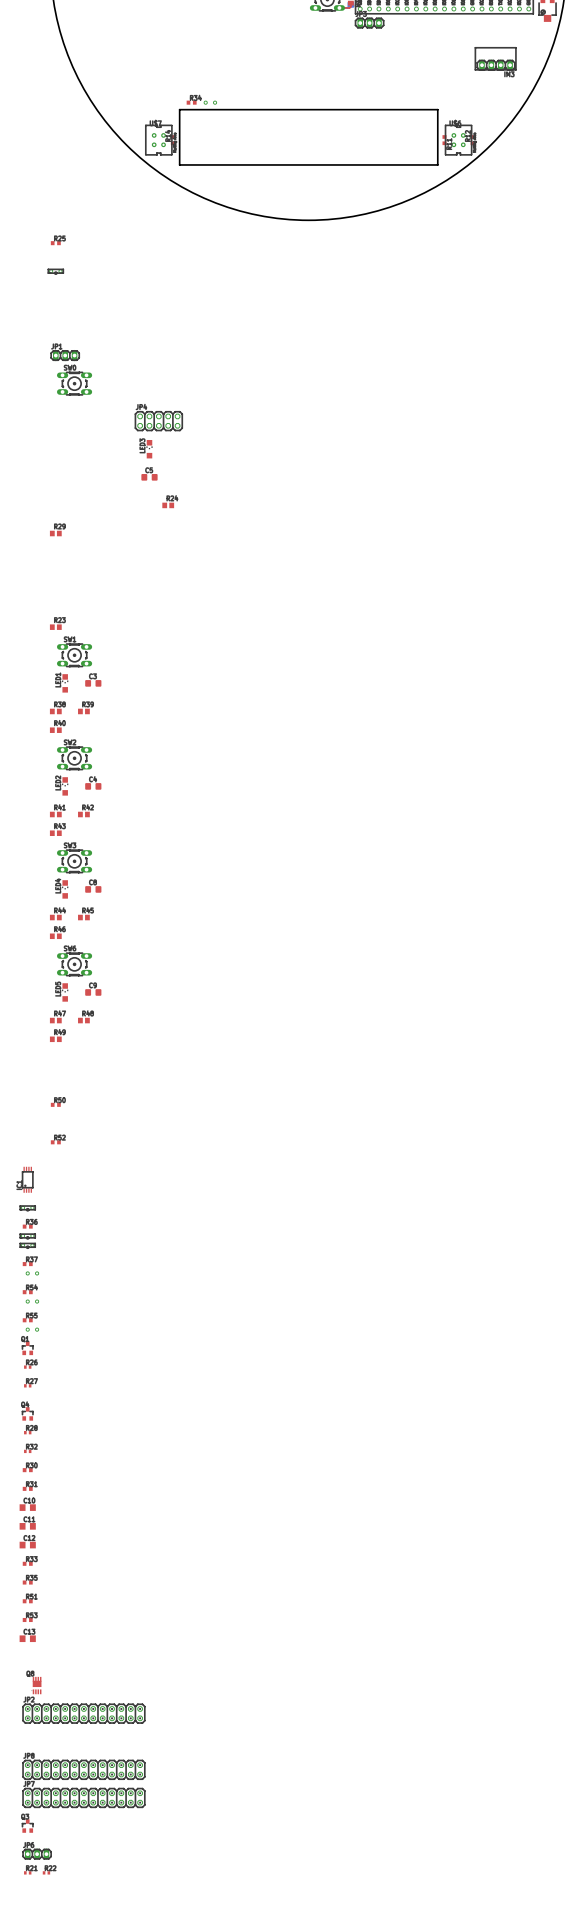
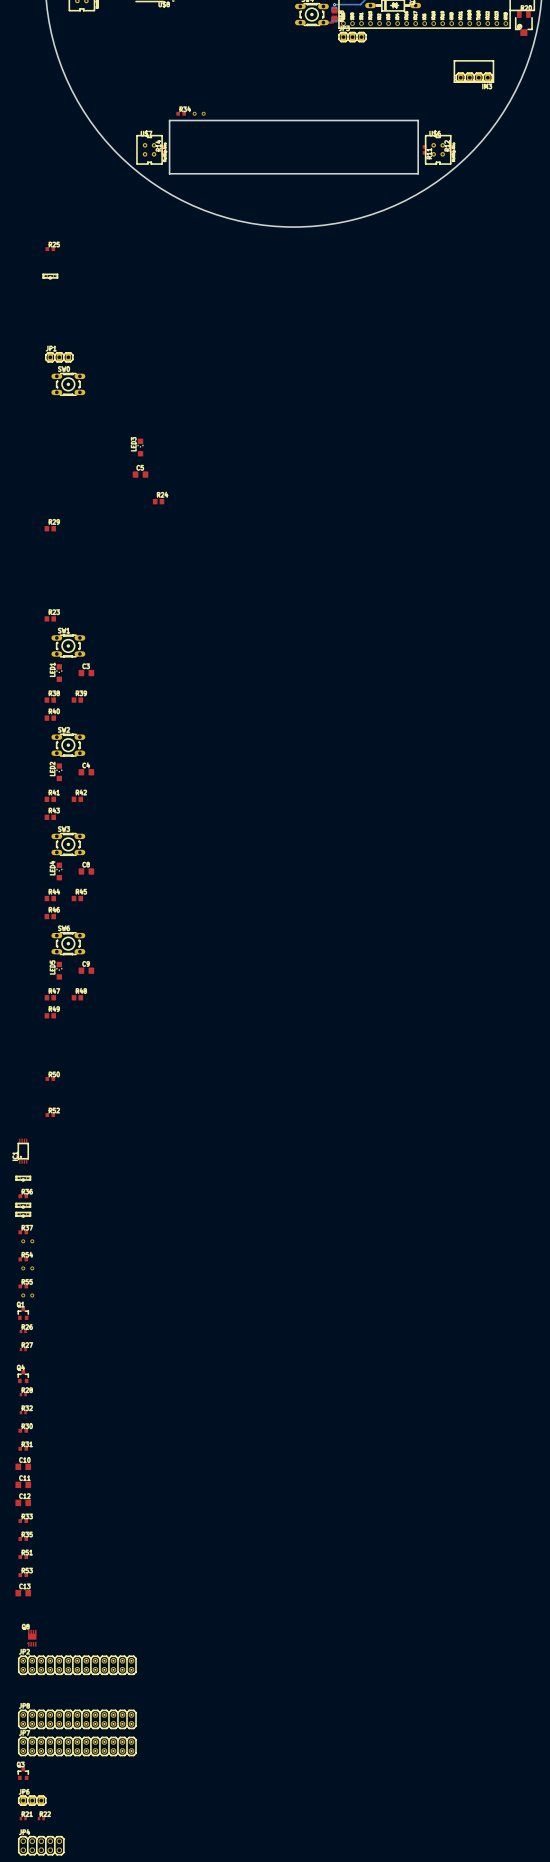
part position: (158, 421) -> (41, 1845)

